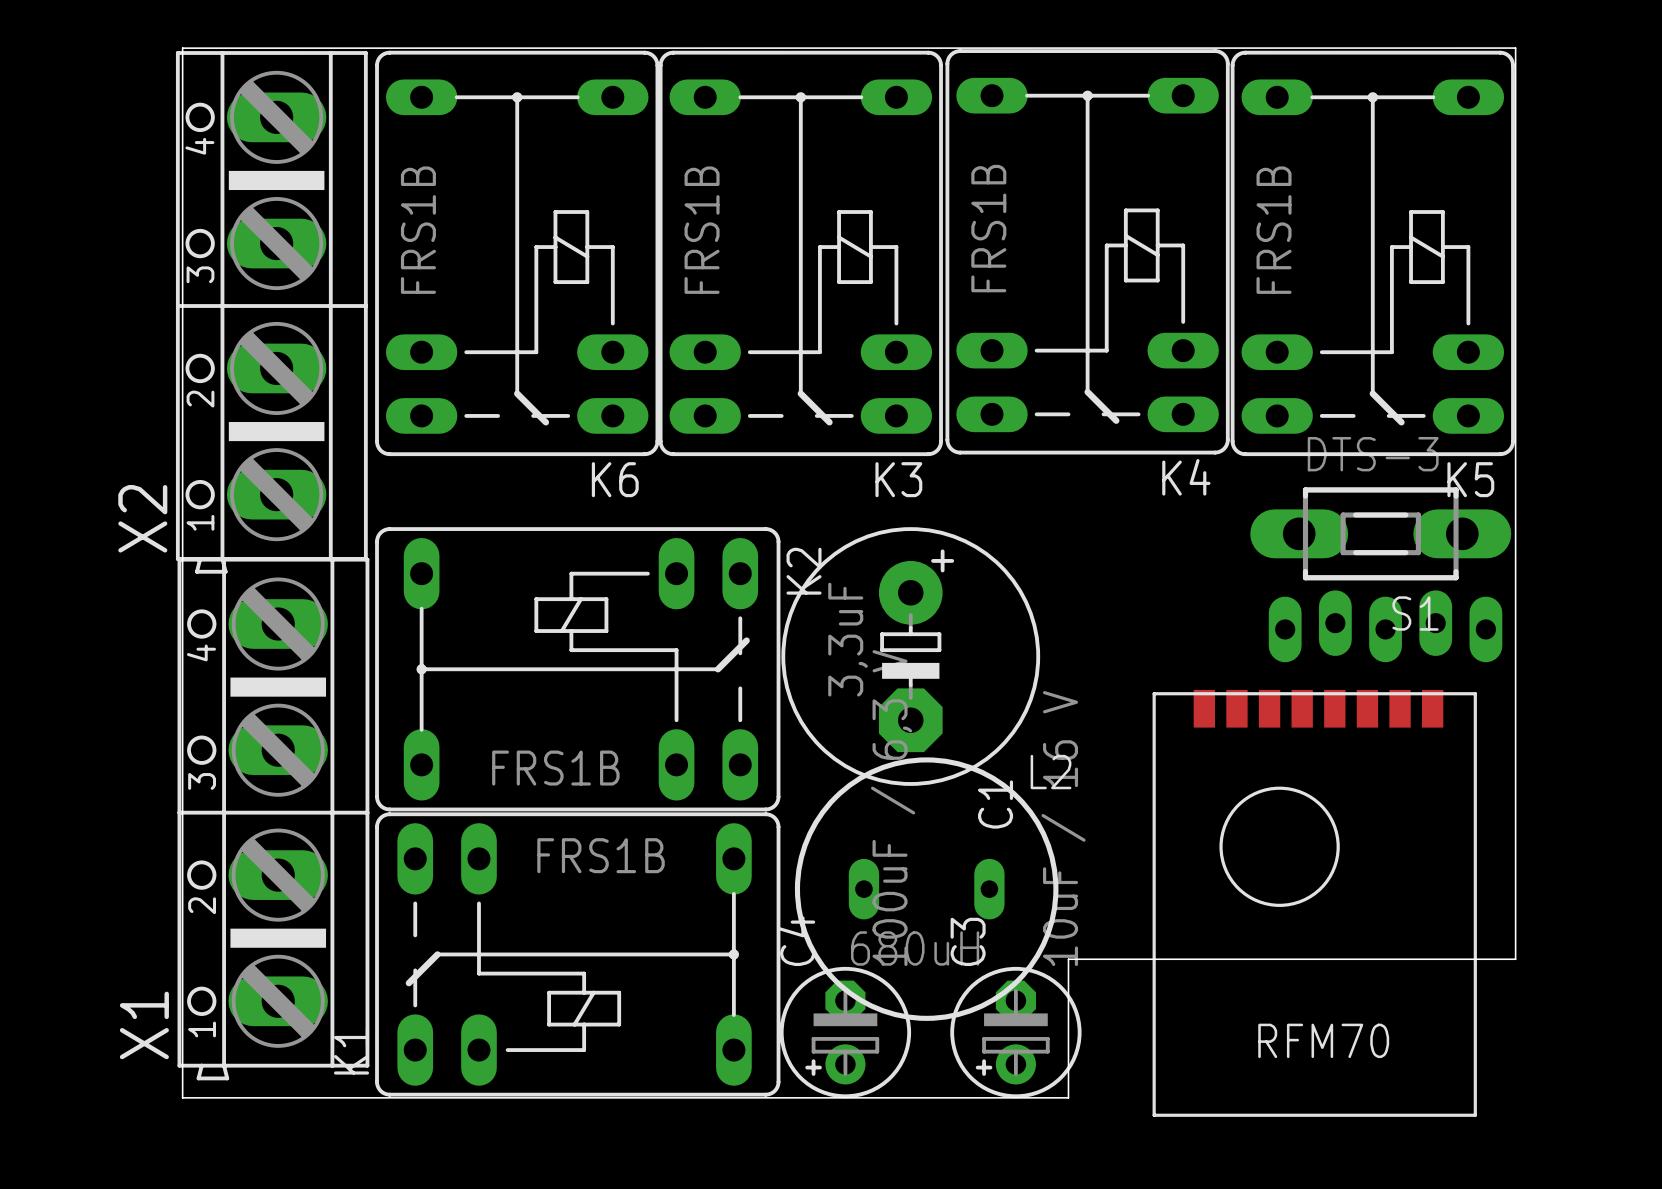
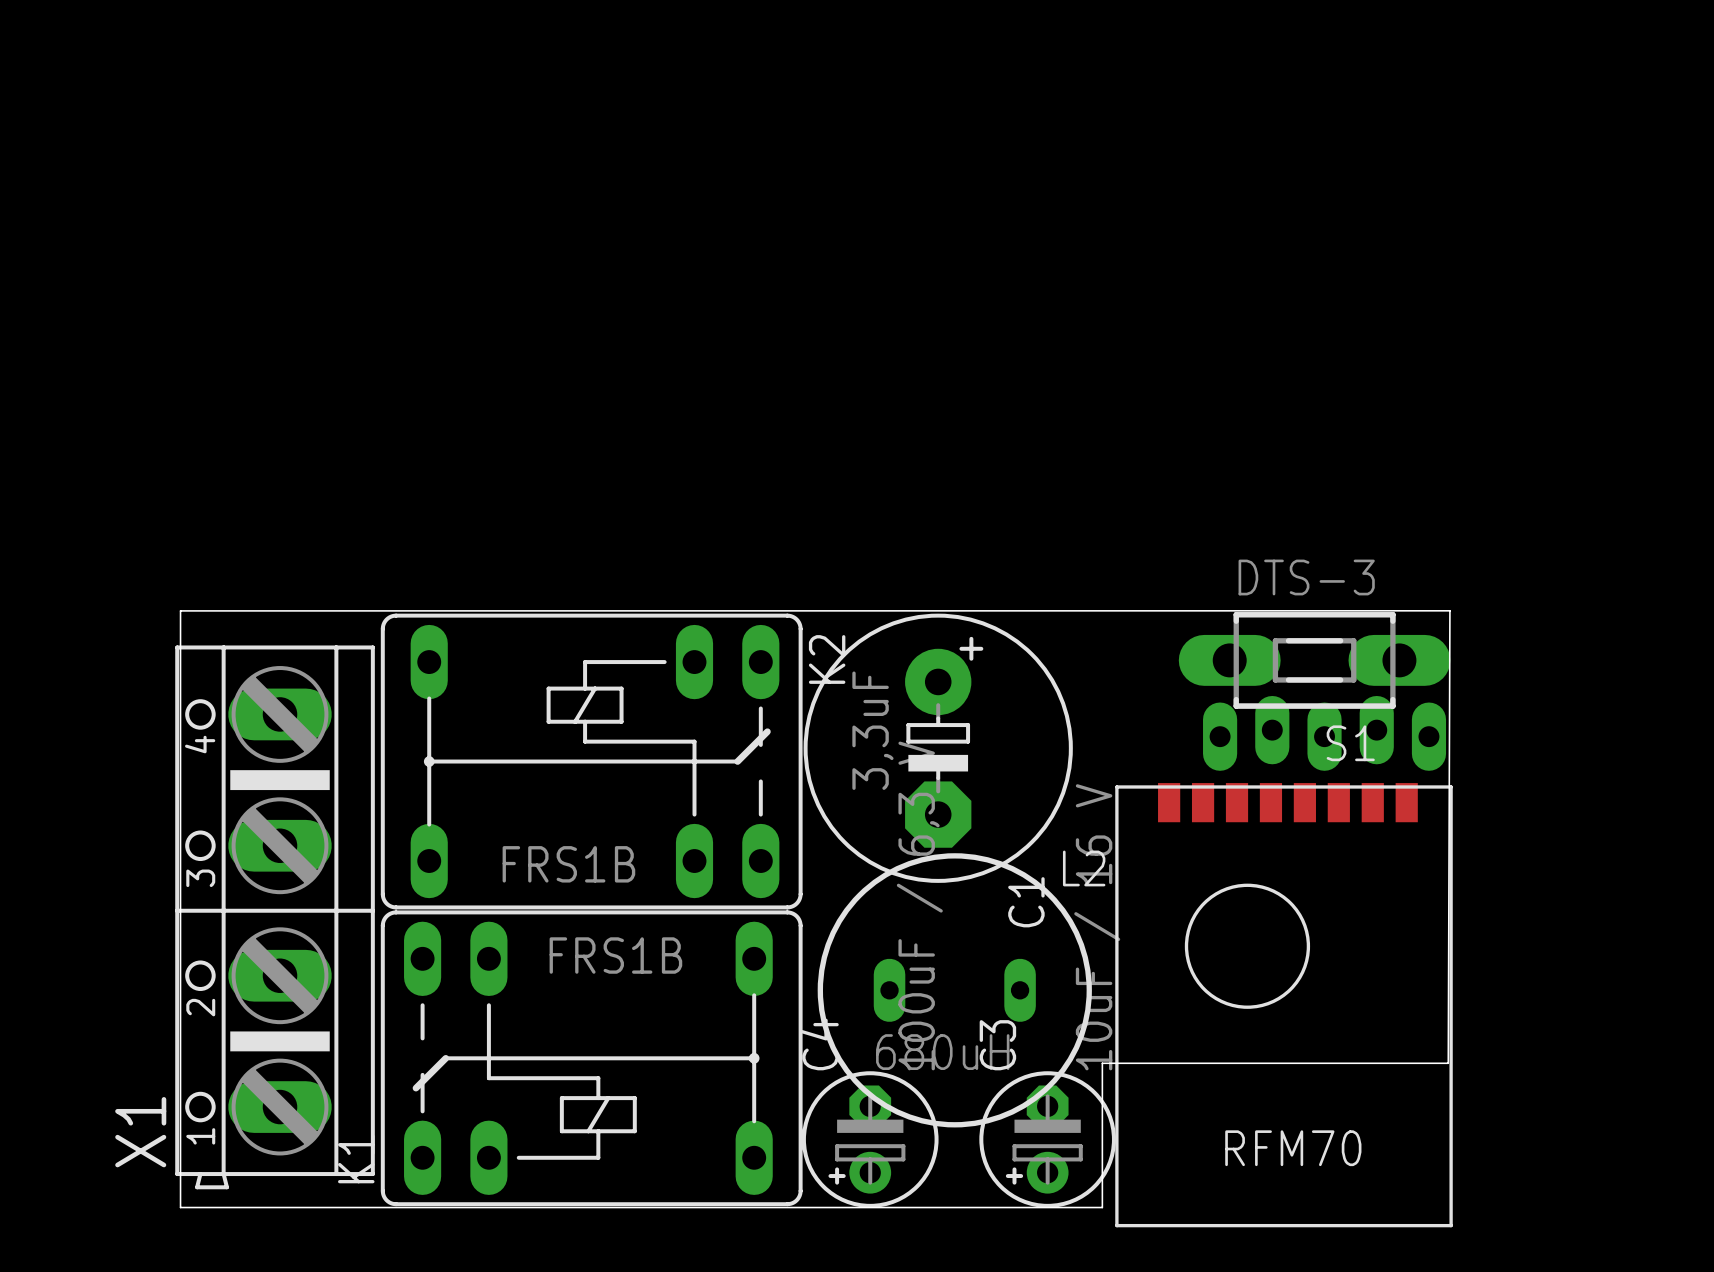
K4: FRS1B (1087, 251) -> none
K6: FRS1B (517, 253) -> none
K3: FRS1B (800, 253) -> none
K5: FRS1B (1372, 253) -> none
X2: (271, 312) -> none
board edge: (182, 524) (182, 48) (1515, 48) (1515, 959) (1400, 959) -> (180, 610) (1449, 610) (1448, 1063)
S1 position: (1380, 533) -> (1314, 660)
part position: (1385, 626) -> (1324, 733)
part position: (1314, 903) -> (1284, 1005)

